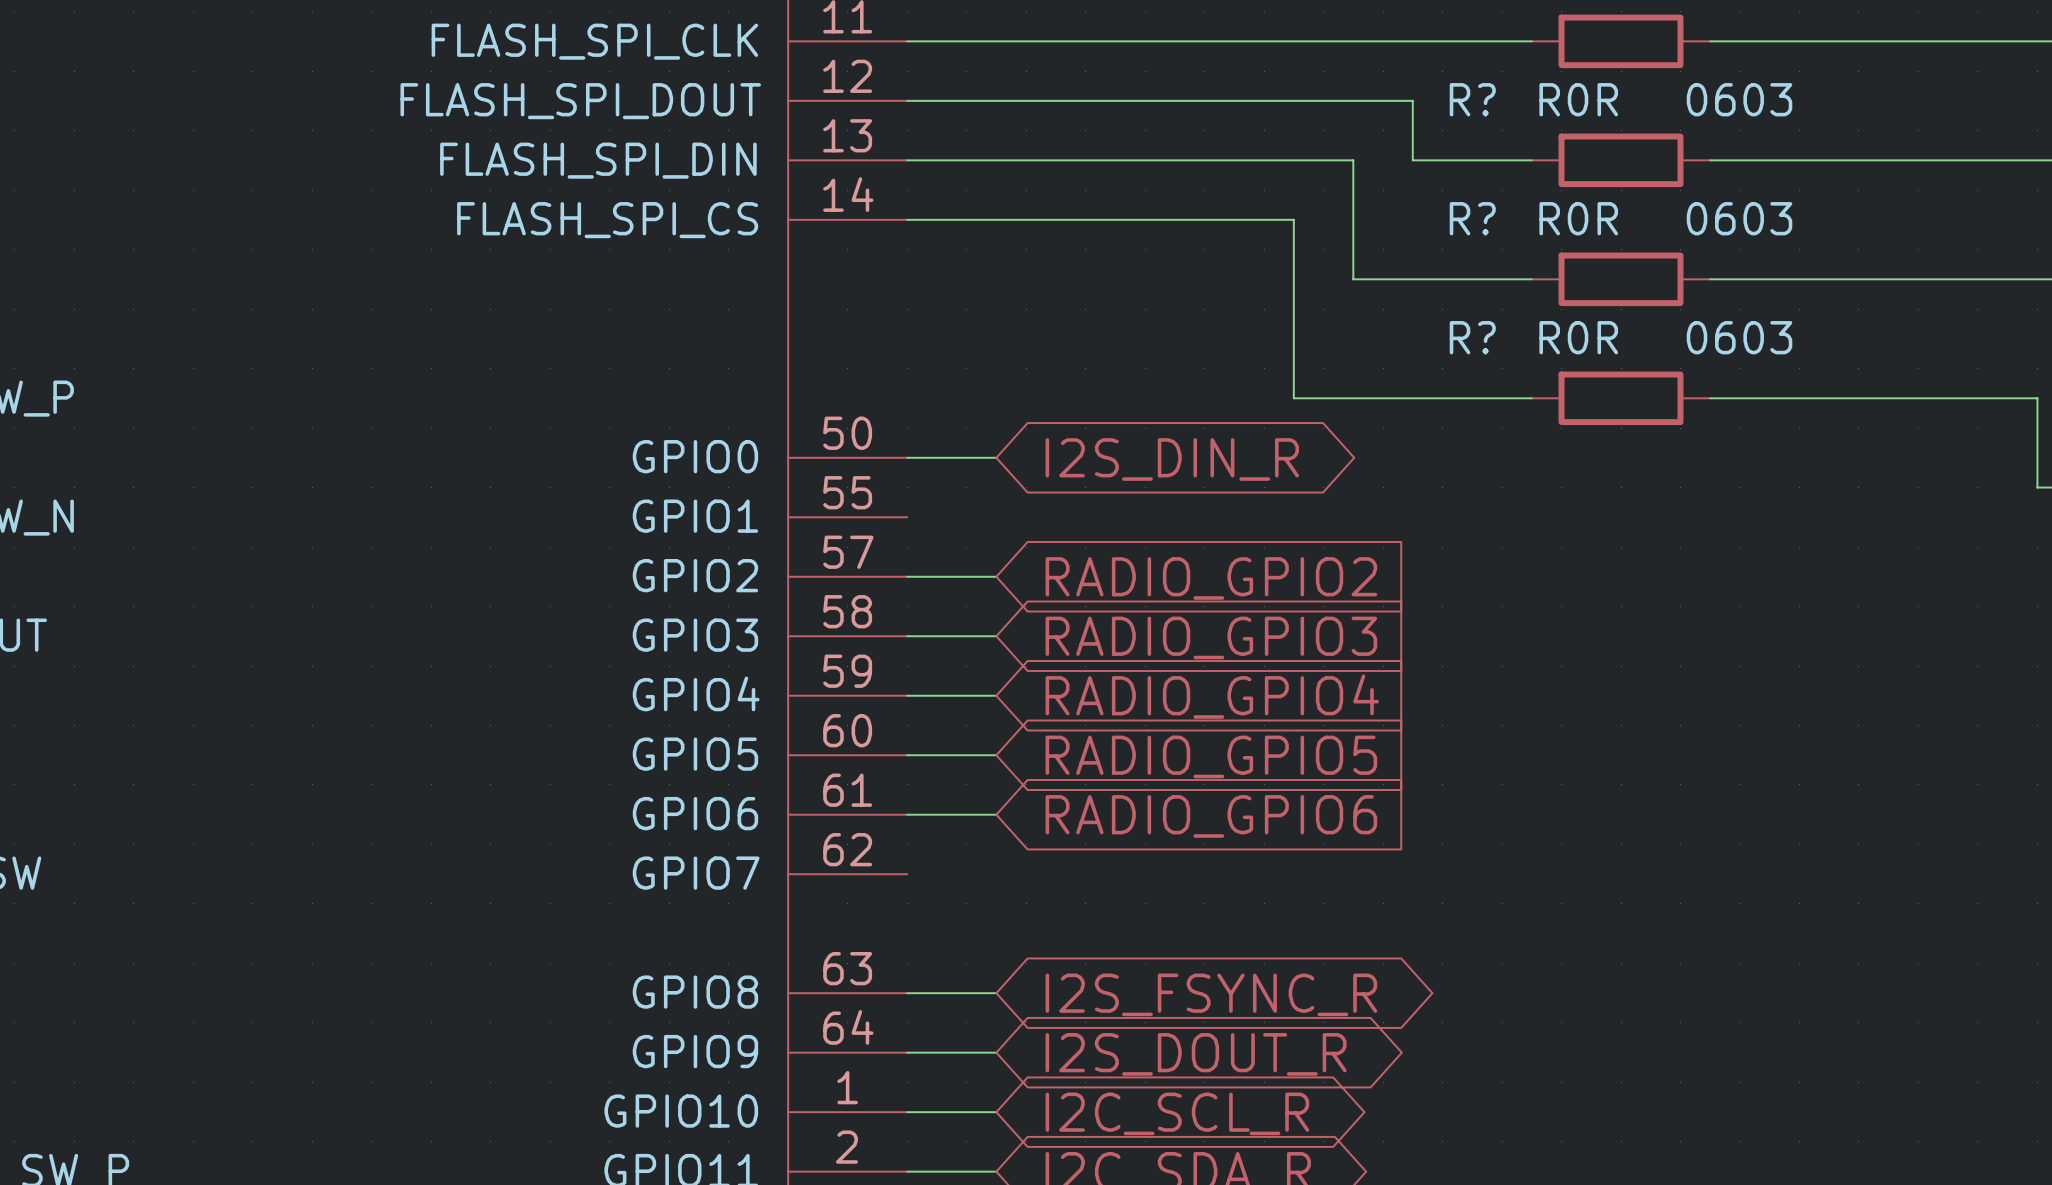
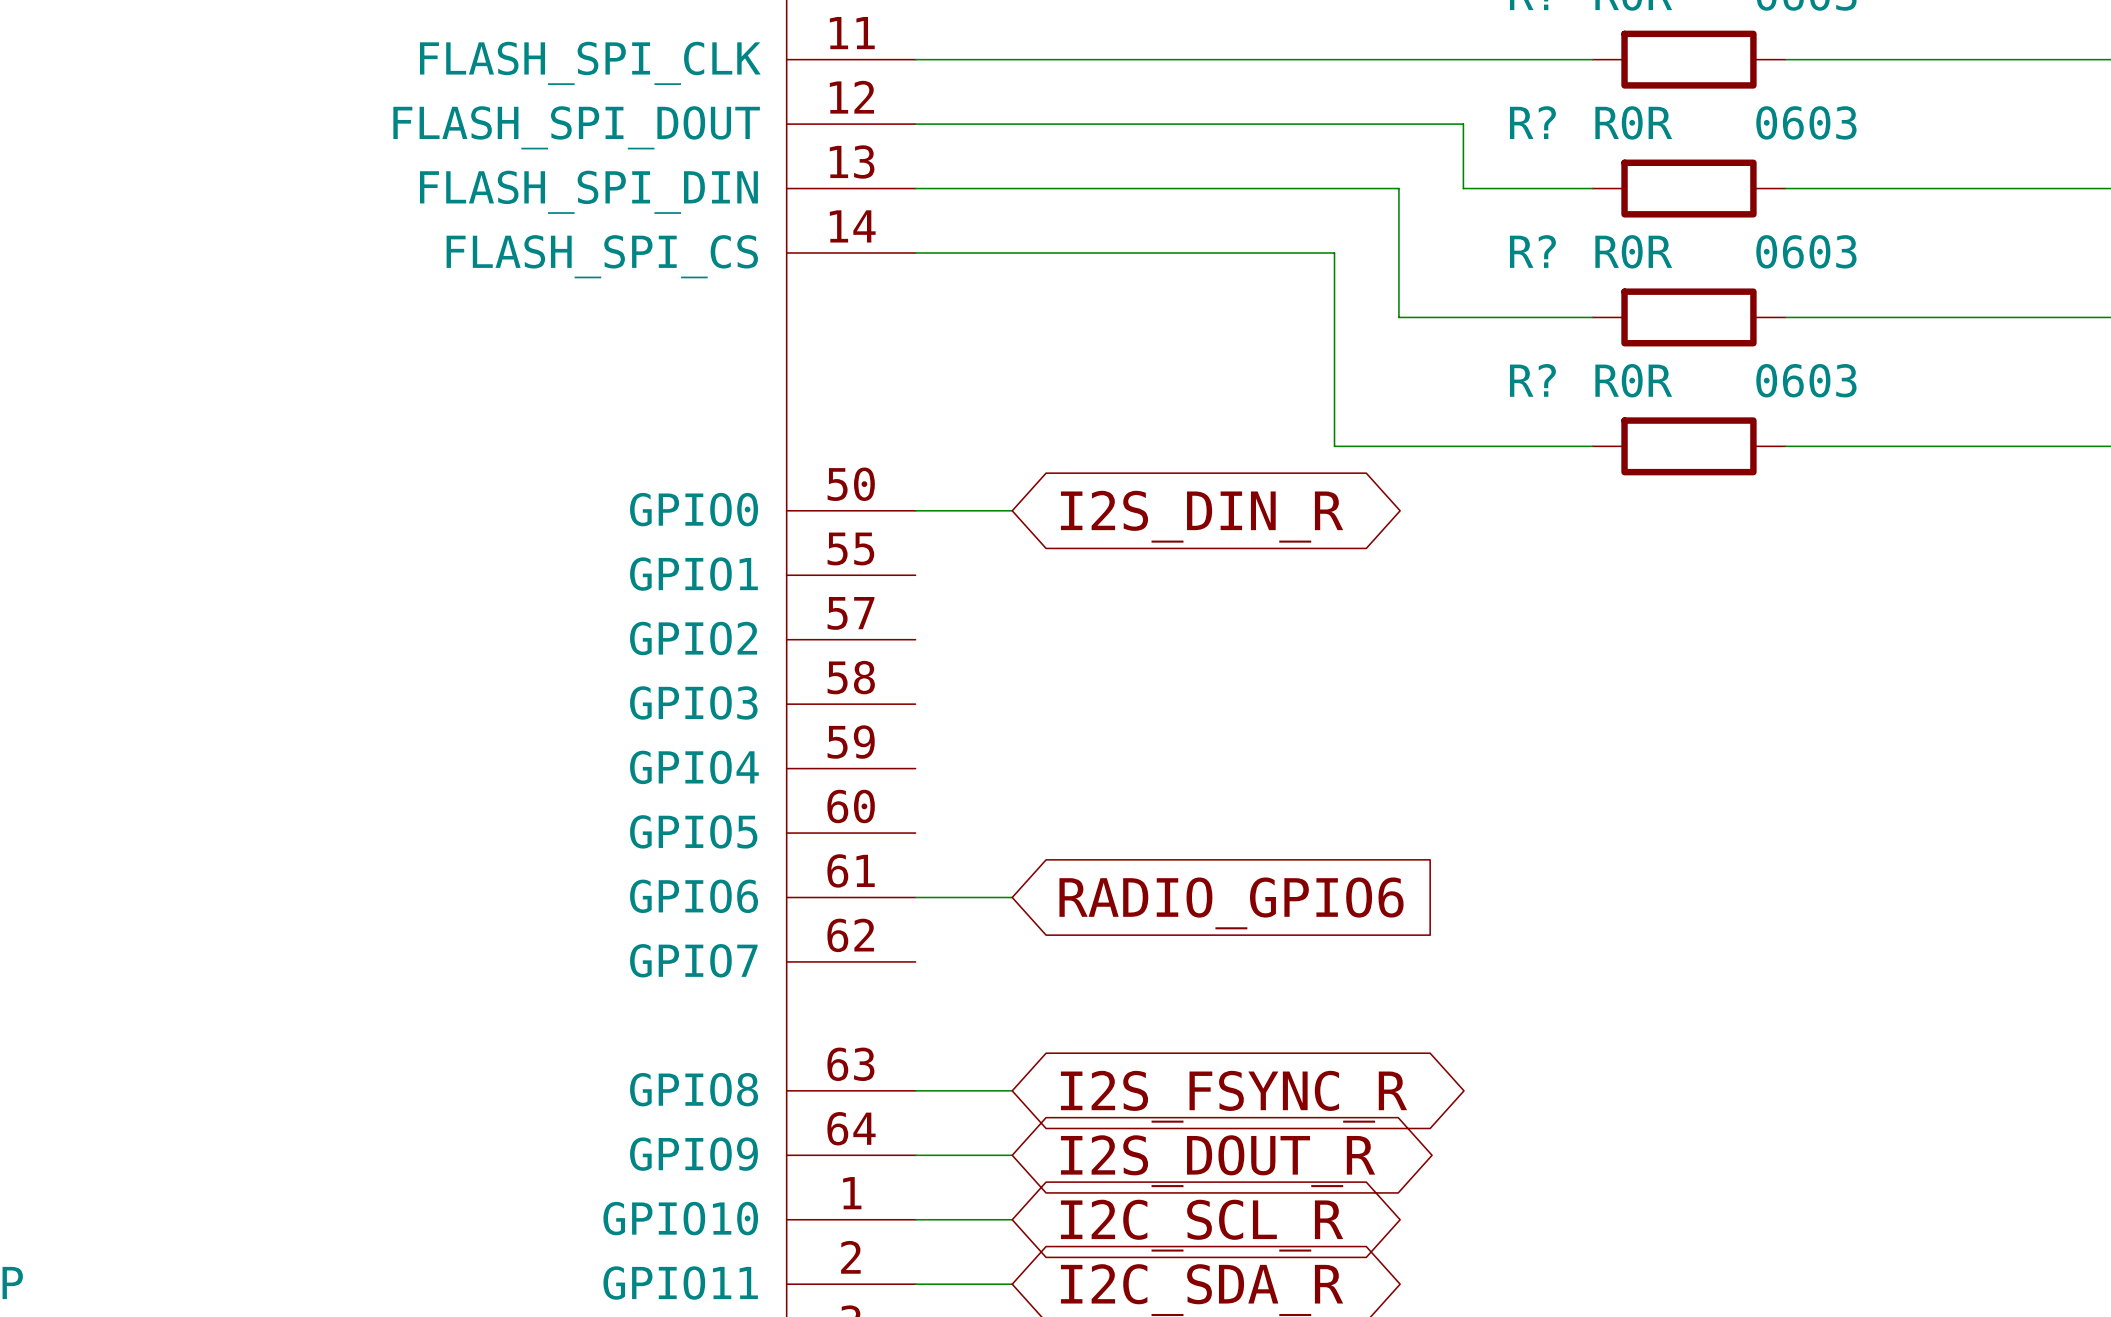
wire: (907, 576) (996, 576) -> none
global label: RADIO_GPIO2 (1211, 578) -> none
wire: (907, 636) (996, 636) -> none
global label: RADIO_GPIO3 (1211, 637) -> none
wire: (907, 695) (996, 695) -> none
global label: RADIO_GPIO4 (1212, 696) -> none
wire: (907, 755) (996, 755) -> none
global label: RADIO_GPIO5 (1211, 756) -> none

